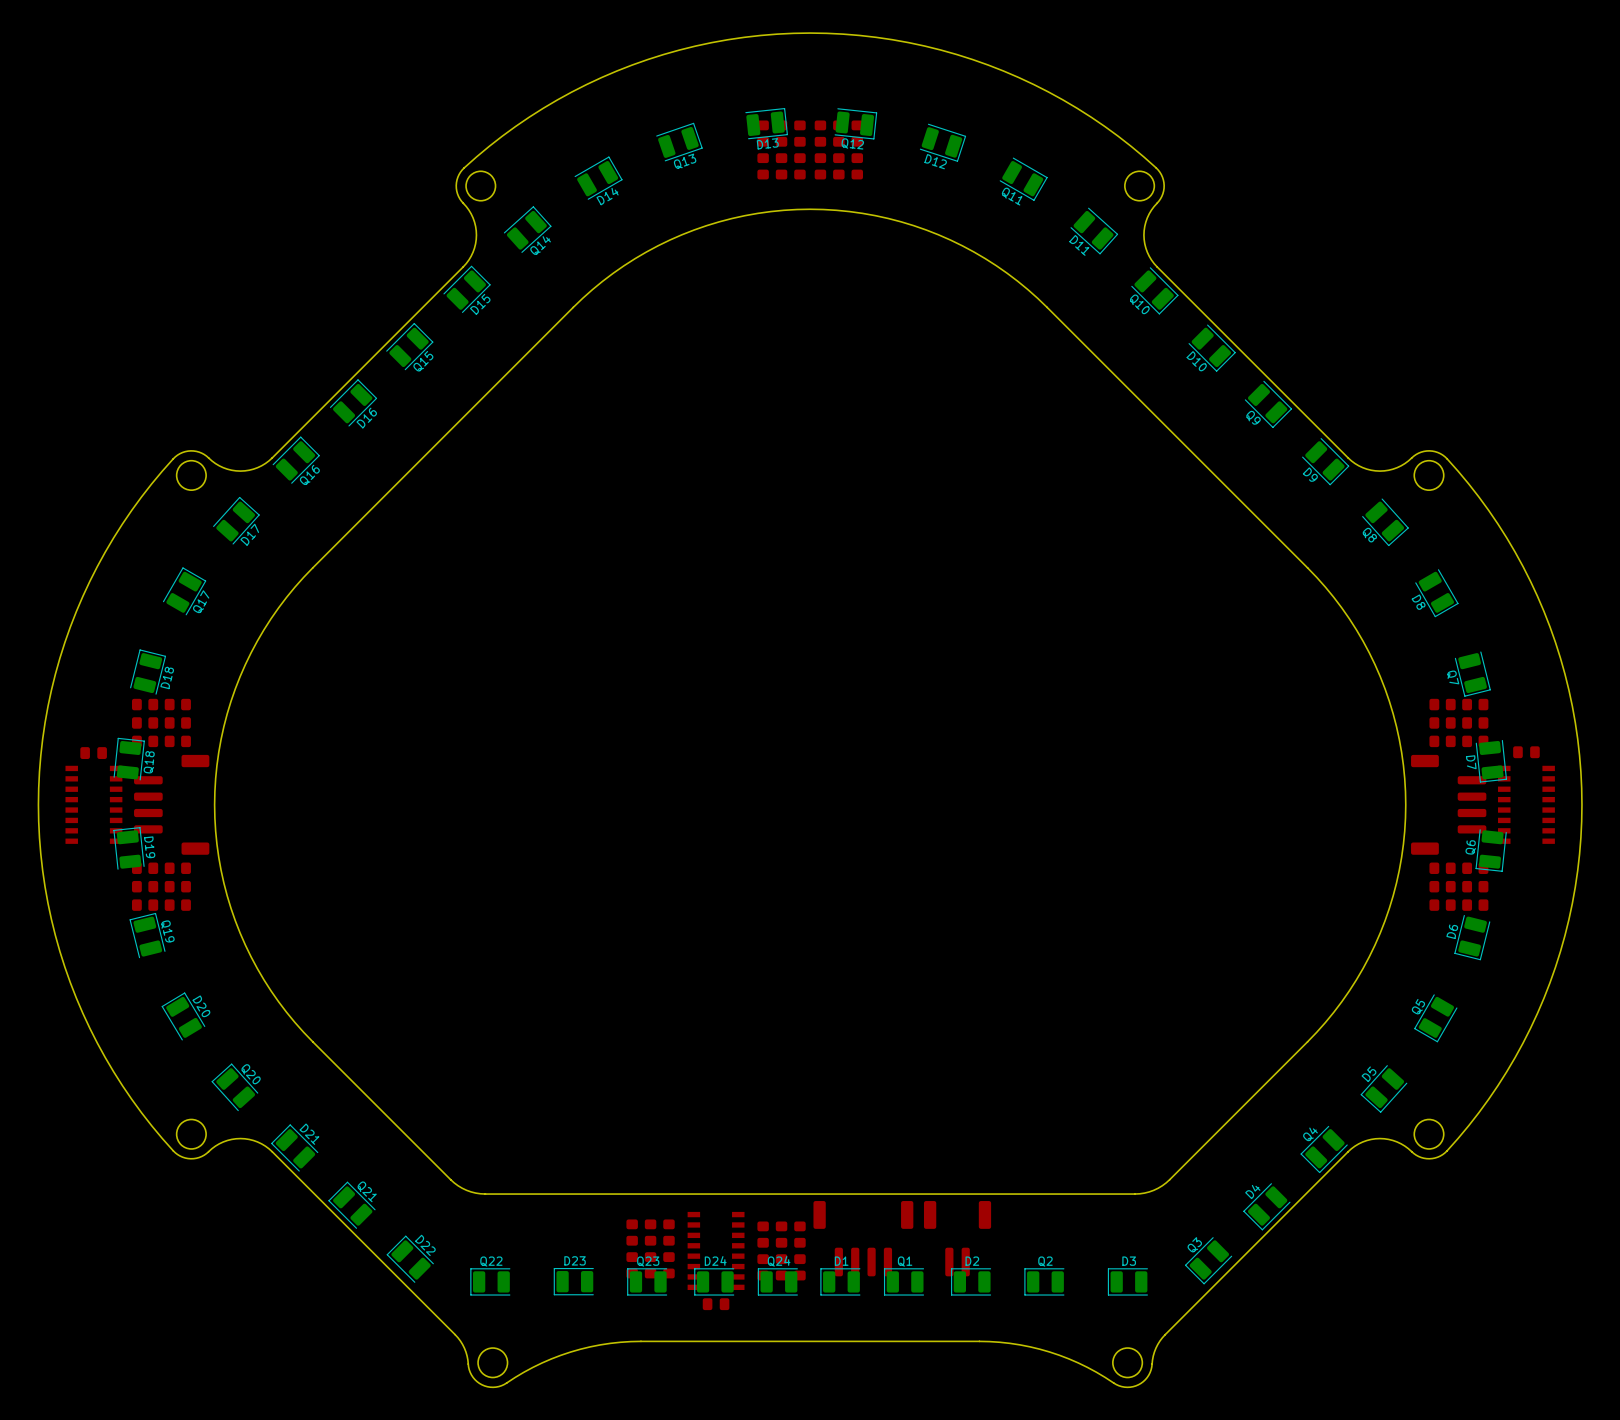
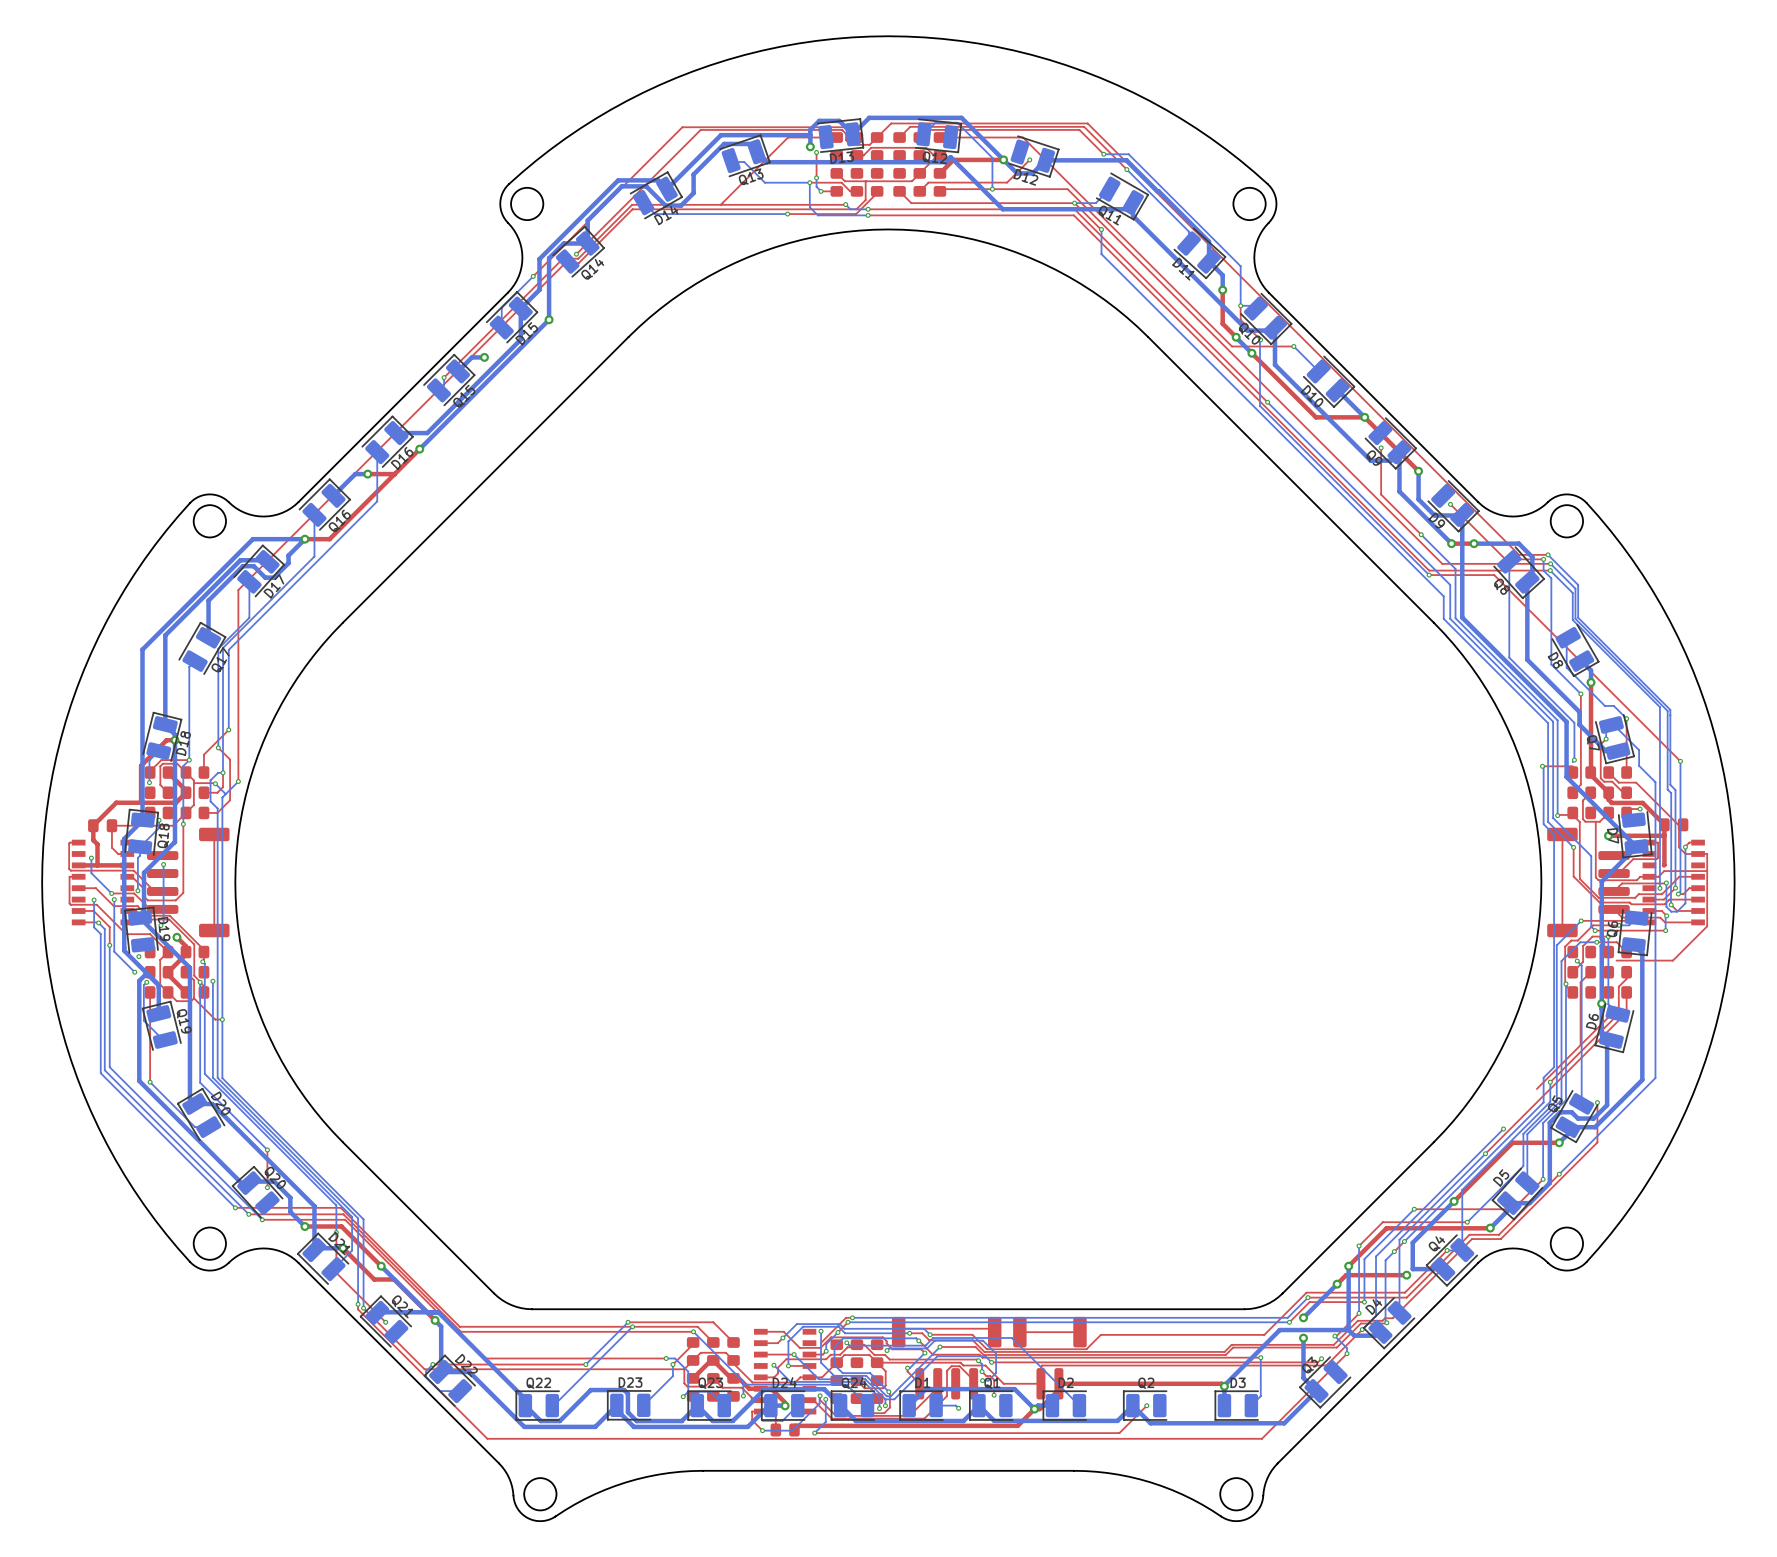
bottom track: none -> (923, 134) (935, 122) (957, 122) (992, 157) (992, 189)
bottom track: none -> (810, 135) (721, 135) (666, 189) (658, 180) (618, 180) (539, 259) (539, 289) (520, 308) (520, 339) (427, 433) (396, 433)
top track: none -> (836, 137) (788, 137) (720, 204)
top track: none -> (856, 137) (846, 127) (682, 127) (533, 276)
top track: none -> (877, 137) (891, 123) (1087, 123) (1519, 554) (1548, 554)
top track: none -> (877, 137) (869, 144) (850, 144) (846, 140) (846, 133) (842, 129) (700, 129) (576, 254)
top track: none -> (899, 137) (910, 126) (1084, 126) (1126, 169)
top track: none -> (919, 137) (927, 129) (1079, 129) (1103, 154)
top track: none -> (939, 137) (1023, 137) (1231, 346) (1293, 346)
bottom track: none -> (810, 146) (810, 129) (819, 120) (839, 120) (852, 134) (869, 117) (961, 117) (1017, 173) (1032, 173) (1045, 160) (1126, 160) (1209, 241) (1209, 261) (1222, 275) (1222, 290)
via: none -> (810, 146)
top track: none -> (816, 152) (816, 177)
via: none -> (816, 152)
bottom track: none -> (1103, 154) (1128, 154) (1240, 266) (1240, 305) (1253, 305) (1255, 308)
via: none -> (1103, 154)
top track: none -> (856, 155) (863, 155) (871, 147) (926, 147) (935, 157)
top track: none -> (935, 157) (911, 181) (844, 181) (836, 173)
top track: none -> (1003, 159) (953, 159) (939, 173)
via: none -> (1003, 159)
top track: none -> (1029, 159) (1007, 182) (928, 182) (919, 191)
via: none -> (1029, 159)
bottom track: none -> (731, 160) (744, 162) (764, 182) (809, 182) (809, 207) (817, 215) (868, 215)
bottom track: none -> (1126, 169) (1189, 231) (1189, 243)
via: none -> (1126, 169)
bottom track: none -> (816, 177) (816, 186) (821, 191)
via: none -> (816, 177)
top track: none -> (865, 181) (865, 200) (856, 209) (632, 209) (578, 263) (565, 263) (238, 590) (238, 781)
top track: none -> (809, 182) (841, 182) (850, 191) (856, 191)
via: none -> (809, 182)
via: none -> (992, 189)
bottom track: none -> (1109, 189) (1095, 203) (1074, 203)
via: none -> (821, 191)
top track: none -> (836, 191) (821, 191)
top track: none -> (877, 191) (856, 214) (787, 214)
top track: none -> (899, 191) (911, 203) (1074, 203) (1101, 229)
top track: none -> (939, 191) (942, 189) (1067, 189) (1442, 563) (1550, 563)
bottom track: none -> (643, 202) (655, 214) (787, 214)
bottom track: none -> (1133, 202) (1133, 216) (1247, 330) (1272, 330) (1274, 327) (1274, 364) (1370, 460) (1390, 460) (1399, 452) (1399, 491) (1451, 543)
via: none -> (1074, 203)
top track: none -> (845, 204) (632, 204) (578, 258) (562, 258) (444, 377)
bottom track: none -> (845, 204) (850, 209) (868, 209)
via: none -> (845, 204)
top track: none -> (868, 209) (1074, 209) (1267, 402)
via: none -> (868, 209)
bottom track: none -> (1133, 209) (1002, 209) (950, 157) (945, 162) (767, 162) (748, 143) (724, 143) (693, 174) (693, 193) (681, 205) (665, 205) (646, 186) (621, 186) (587, 220) (587, 243) (563, 243) (549, 258) (549, 319) (419, 449)
via: none -> (787, 214)
top track: none -> (868, 215) (1073, 215) (1429, 570) (1550, 570)
via: none -> (868, 215)
bottom track: none -> (1101, 229) (1101, 254) (1443, 596) (1443, 618) (1548, 723) (1548, 821) (1573, 847)
via: none -> (1101, 229)
via: none -> (576, 254)
bottom track: none -> (533, 276) (501, 307) (501, 327)
via: none -> (533, 276)
top track: none -> (1222, 290) (1222, 323) (1236, 337)
via: none -> (1222, 290)
top track: none -> (1240, 305) (1240, 319) (1260, 339)
via: none -> (1240, 305)
via: none -> (549, 319)
bottom track: none -> (1236, 337) (1251, 353)
via: none -> (1236, 337)
bottom track: none -> (1260, 339) (1260, 405) (1429, 575)
via: none -> (1260, 339)
bottom track: none -> (1293, 346) (1318, 371)
via: none -> (1293, 346)
top track: none -> (1251, 353) (1316, 417) (1364, 417) (1418, 471)
via: none -> (1251, 353)
bottom track: none -> (484, 357) (471, 357) (458, 371)
via: none -> (484, 357)
bottom track: none -> (444, 377) (444, 385) (438, 390)
via: none -> (444, 377)
bottom track: none -> (1337, 390) (1364, 417)
bottom track: none -> (1267, 402) (1450, 584) (1450, 618) (1553, 721) (1553, 817) (1591, 856) (1591, 926) (1595, 930)
via: none -> (1267, 402)
via: none -> (1364, 417)
top track: none -> (1381, 447) (1381, 494) (1421, 534)
via: none -> (1381, 447)
top track: none -> (419, 449) (329, 539) (304, 539)
via: none -> (419, 449)
bottom track: none -> (377, 452) (377, 501) (228, 649) (228, 729)
bottom track: none -> (1418, 471) (1418, 499) (1434, 515) (1462, 514) (1462, 617) (1566, 721) (1566, 776) (1636, 846) (1601, 881) (1601, 1034) (1607, 1040)
via: none -> (1418, 471)
bottom track: none -> (367, 474) (355, 474) (333, 495)
via: none -> (367, 474)
top track: none -> (394, 474) (367, 474)
top track: none -> (1450, 504) (1505, 559) (1543, 559)
via: none -> (1450, 504)
bottom track: none -> (314, 514) (314, 556) (223, 647) (223, 772) (218, 772) (210, 780) (210, 801) (217, 808) (217, 1077) (358, 1218) (358, 1304)
bottom track: none -> (1421, 534) (1455, 568) (1455, 618) (1557, 720) (1557, 815)
via: none -> (1421, 534)
via: none -> (304, 539)
via: none -> (1451, 543)
top track: none -> (1474, 543) (1451, 543)
bottom track: none -> (1474, 543) (1518, 543) (1532, 557) (1532, 576) (1527, 581) (1527, 659) (1579, 711) (1579, 724) (1605, 751) (1617, 751)
via: none -> (1474, 543)
bottom track: none -> (1548, 554) (1578, 584) (1578, 617) (1670, 709) (1670, 784) (1675, 789) (1675, 888)
via: none -> (1548, 554)
bottom track: none -> (1543, 559) (1543, 570) (1551, 578) (1551, 664) (1580, 694)
via: none -> (1543, 559)
bottom track: none -> (267, 561) (240, 560) (165, 635) (165, 724) (174, 734) (174, 842) (144, 872) (144, 914) (140, 918) (189, 967) (189, 1099) (194, 1104) (212, 1104) (314, 1206) (314, 1250) (316, 1248) (343, 1248)
bottom track: none -> (1509, 561) (1509, 657) (1574, 722) (1574, 760) (1572, 761)
bottom track: none -> (1550, 563) (1575, 588) (1575, 618) (1667, 711) (1667, 789) (1671, 793) (1671, 904)
via: none -> (1550, 563)
bottom track: none -> (1550, 570) (1572, 593) (1572, 619) (1659, 707) (1659, 888)
via: none -> (1550, 570)
top track: none -> (1429, 575) (1494, 575) (1680, 761)
via: none -> (1429, 575)
bottom track: none -> (249, 581) (249, 617) (218, 648) (218, 747)
bottom track: none -> (208, 637) (208, 600) (242, 566) (253, 566) (265, 577) (274, 577) (288, 563) (288, 555) (304, 539) (252, 539) (142, 649) (142, 820) (124, 838) (124, 950) (158, 985) (158, 1013)
bottom track: none -> (1568, 637) (1566, 667) (1604, 705) (1613, 705) (1626, 718)
bottom track: none -> (195, 661) (189, 666) (189, 760) (183, 766) (183, 824)
bottom track: none -> (1581, 661) (1591, 670) (1591, 682)
top track: none -> (1591, 682) (1590, 774) (1608, 792) (1608, 799) (1611, 802) (1642, 802) (1664, 824) (1664, 865)
via: none -> (1591, 682)
top track: none -> (1580, 694) (1580, 784) (1572, 792)
via: none -> (1580, 694)
top track: none -> (1626, 718) (1626, 772)
via: none -> (1626, 718)
top track: none -> (228, 729) (203, 754) (203, 772)
via: none -> (228, 729)
top track: none -> (1606, 739) (1600, 744) (1600, 778) (1604, 781) (1612, 781) (1623, 792) (1626, 792)
bottom track: none -> (1606, 739) (1606, 730) (1613, 724) (1639, 750) (1639, 765) (1655, 782) (1655, 1078) (1559, 1174)
via: none -> (1606, 739)
top track: none -> (174, 740) (166, 740) (141, 765) (141, 802)
via: none -> (174, 740)
top track: none -> (218, 747) (230, 759) (230, 800) (217, 812) (203, 812)
via: none -> (218, 747)
bottom track: none -> (158, 751) (149, 760) (149, 782)
top track: none -> (189, 760) (161, 760) (150, 772)
via: none -> (189, 760)
via: none -> (1574, 760)
bottom track: none -> (1680, 761) (1680, 891) (1678, 894)
via: none -> (1680, 761)
bottom track: none -> (1542, 766) (1543, 824) (1554, 834) (1554, 1067) (1543, 1077) (1543, 1102) (1404, 1241)
via: none -> (1542, 766)
top track: none -> (1572, 766) (1542, 766)
top track: none -> (168, 772) (186, 790) (176, 802) (116, 802) (93, 825) (93, 840) (97, 844) (97, 865)
top track: none -> (223, 772) (223, 787) (217, 792) (203, 792)
via: none -> (223, 772)
top track: none -> (1608, 772) (1618, 782) (1636, 782) (1680, 826)
bottom track: none -> (238, 781) (222, 797) (222, 1078) (363, 1219) (363, 1308)
via: none -> (238, 781)
via: none -> (149, 782)
top track: none -> (193, 783) (215, 783)
bottom track: none -> (215, 783) (225, 794)
via: none -> (215, 783)
top track: none -> (168, 792) (160, 785) (160, 766) (162, 763) (177, 763) (193, 780) (193, 805) (173, 825) (111, 825) (111, 847) (118, 853) (127, 853)
top track: none -> (1590, 792) (1582, 800) (1582, 819) (1585, 821) (1599, 821) (1608, 812)
top track: none -> (1640, 809) (1630, 809) (1626, 812)
via: none -> (1640, 809)
via: none -> (1557, 815)
top track: none -> (1572, 814) (1579, 822) (1579, 878) (1598, 897) (1635, 897) (1638, 894) (1661, 894) (1679, 876) (1698, 876)
top track: none -> (1572, 814) (1557, 815)
bottom track: none -> (159, 820) (159, 828) (140, 846) (140, 855) (137, 857) (137, 890)
via: none -> (159, 820)
top track: none -> (1595, 821) (1595, 877) (1598, 880) (1636, 880) (1640, 876) (1658, 876) (1664, 871) (1707, 871)
top track: none -> (183, 824) (183, 892) (175, 900) (147, 900) (143, 895) (143, 888) (132, 876) (127, 876)
via: none -> (183, 824)
top track: none -> (1683, 824) (1679, 827) (1679, 847) (1685, 853) (1707, 853) (1707, 926) (1672, 960) (1616, 960)
top track: none -> (214, 834) (214, 930)
top track: none -> (1562, 834) (1562, 930)
via: none -> (1608, 835)
top track: none -> (1664, 835) (1608, 835)
top track: none -> (78, 842) (69, 843) (69, 868) (70, 870) (133, 870) (154, 891) (162, 891)
top track: none -> (1649, 842) (1658, 842) (1656, 859) (1633, 859) (1618, 873) (1614, 873)
top track: none -> (1698, 842) (1689, 842) (1685, 847)
top track: none -> (1573, 847) (1573, 876) (1599, 902) (1664, 904) (1669, 899) (1698, 899)
via: none -> (1573, 847)
bottom track: none -> (1685, 847) (1685, 903) (1677, 911) (1671, 911) (1666, 906) (1666, 883)
via: none -> (1685, 847)
bottom track: none -> (91, 858) (91, 873) (111, 893)
via: none -> (91, 858)
bottom track: none -> (163, 864) (163, 922) (160, 925)
via: none -> (163, 864)
top track: none -> (127, 865) (78, 865)
top track: none -> (78, 876) (69, 876) (69, 903) (96, 904) (126, 934) (150, 934) (168, 952) (160, 959) (160, 984) (176, 1001) (191, 1001) (194, 998)
top track: none -> (1666, 883) (1622, 883) (1614, 891)
via: none -> (1666, 883)
top track: none -> (1675, 888) (1663, 899) (1649, 899)
via: none -> (1675, 888)
top track: none -> (78, 888) (95, 888) (113, 906) (137, 906) (147, 915) (169, 915) (203, 949) (202, 961)
via: none -> (1659, 888)
top track: none -> (1698, 888) (1689, 888) (1683, 894) (1678, 894)
via: none -> (137, 890)
top track: none -> (111, 893) (134, 893) (150, 909) (162, 909)
via: none -> (111, 893)
via: none -> (1678, 894)
bottom track: none -> (94, 900) (94, 927) (100, 934) (100, 1073) (235, 1207)
via: none -> (94, 900)
bottom track: none -> (114, 899) (114, 951) (134, 972)
via: none -> (114, 899)
top track: none -> (1671, 904) (1677, 910) (1698, 910)
via: none -> (1671, 904)
top track: none -> (1614, 909) (1622, 917) (1660, 917) (1665, 922) (1698, 922)
top track: none -> (78, 910) (93, 910) (109, 927) (109, 945)
top track: none -> (127, 910) (135, 910) (144, 919) (169, 919) (194, 944) (194, 975) (203, 986) (203, 992)
top track: none -> (1649, 910) (1661, 910) (1666, 915)
bottom track: none -> (1666, 915) (1665, 930)
via: none -> (1666, 915)
bottom track: none -> (1636, 918) (1629, 925) (1619, 925)
top track: none -> (1581, 920) (1649, 922)
bottom track: none -> (1581, 920) (1556, 945) (1556, 1100) (1523, 1133) (1523, 1166) (1467, 1222)
via: none -> (1581, 920)
top track: none -> (78, 922) (98, 922)
bottom track: none -> (98, 922) (104, 929) (104, 1070) (248, 1214)
via: none -> (98, 922)
top track: none -> (1619, 925) (1593, 925) (1577, 940) (1571, 940) (1565, 946) (1565, 983) (1572, 992)
via: none -> (1619, 925)
via: none -> (160, 925)
via: none -> (1595, 930)
top track: none -> (1665, 930) (1595, 930)
via: none -> (1665, 930)
top track: none -> (176, 937) (186, 946) (186, 954) (168, 974) (186, 992)
via: none -> (176, 937)
top track: none -> (1608, 936) (1592, 936) (1583, 946) (1583, 961) (1572, 972)
bottom track: none -> (1608, 936) (1608, 1004) (1617, 1013)
via: none -> (1608, 936)
top track: none -> (1596, 942) (1616, 942) (1626, 952)
bottom track: none -> (1596, 942) (1580, 942) (1561, 961) (1561, 1100) (1527, 1134) (1527, 1183)
via: none -> (1596, 942)
bottom track: none -> (1633, 944) (1642, 953) (1642, 1079) (1595, 1127) (1568, 1127) (1568, 1133) (1559, 1142)
bottom track: none -> (109, 945) (109, 1067) (262, 1219)
via: none -> (109, 945)
via: none -> (138, 956)
bottom track: none -> (1577, 961) (1581, 965) (1581, 1103)
via: none -> (1577, 961)
bottom track: none -> (202, 961) (204, 963) (204, 1073) (336, 1205) (336, 1232)
via: none -> (202, 961)
via: none -> (134, 972)
top track: none -> (186, 972) (194, 980) (194, 998)
top track: none -> (1590, 972) (1580, 982) (1580, 1045)
top track: none -> (1626, 972) (1626, 978) (1618, 986) (1618, 1013) (1550, 1082)
bottom track: none -> (148, 974) (139, 980) (139, 1080) (241, 1183) (274, 1181) (290, 1197) (290, 1211) (304, 1226)
bottom track: none -> (212, 981) (212, 1077) (352, 1216) (352, 1250) (333, 1269)
via: none -> (212, 981)
bottom track: none -> (146, 982) (143, 985) (143, 1020) (165, 1040)
via: none -> (146, 982)
bottom track: none -> (200, 982) (200, 1082) (267, 1149)
via: none -> (200, 982)
bottom track: none -> (1565, 983) (1565, 1100) (1543, 1123) (1543, 1179)
via: none -> (1565, 983)
top track: none -> (150, 992) (150, 1082)
top track: none -> (1626, 992) (1626, 1012) (1485, 1153)
top track: none -> (194, 998) (215, 1019) (222, 1019)
via: none -> (1601, 1003)
top track: none -> (1608, 1017) (1536, 1088)
via: none -> (222, 1019)
bottom track: none -> (1607, 1040) (1607, 1105) (1593, 1118) (1578, 1118) (1571, 1112) (1560, 1112) (1549, 1122) (1549, 1183) (1529, 1203) (1509, 1203) (1509, 1209) (1490, 1228)
bottom track: none -> (150, 1082) (195, 1127) (208, 1127)
via: none -> (150, 1082)
bottom track: none -> (1550, 1082) (1550, 1101) (1462, 1189) (1462, 1250) (1447, 1250)
via: none -> (1550, 1082)
top track: none -> (1597, 1102) (1597, 1142) (1500, 1239) (1472, 1239) (1392, 1318) (1384, 1318) (1382, 1320) (1357, 1320) (1333, 1344) (1231, 1344) (1224, 1351) (984, 1351) (972, 1340) (929, 1340) (922, 1333) (909, 1333)
via: none -> (1597, 1102)
bottom track: none -> (1503, 1128) (1376, 1256) (1376, 1315) (1362, 1329)
via: none -> (1503, 1128)
top track: none -> (1559, 1142) (1512, 1142) (1454, 1201)
via: none -> (1559, 1142)
top track: none -> (267, 1149) (267, 1187)
via: none -> (267, 1149)
bottom track: none -> (1485, 1153) (1399, 1239) (1399, 1312)
via: none -> (1485, 1153)
top track: none -> (1559, 1174) (1498, 1234) (1469, 1234) (1406, 1297) (1307, 1297)
via: none -> (1559, 1174)
top track: none -> (1543, 1179) (1513, 1209) (1414, 1209)
via: none -> (1543, 1179)
via: none -> (267, 1187)
bottom track: none -> (1454, 1201) (1412, 1242) (1412, 1269) (1443, 1269)
via: none -> (1454, 1201)
top track: none -> (235, 1207) (340, 1207) (459, 1326) (697, 1326) (713, 1342)
via: none -> (235, 1207)
bottom track: none -> (1414, 1209) (1364, 1259) (1364, 1302)
via: none -> (1414, 1209)
top track: none -> (248, 1214) (343, 1214) (460, 1331) (693, 1331)
via: none -> (248, 1214)
top track: none -> (262, 1219) (345, 1219) (483, 1358) (666, 1358)
via: none -> (262, 1219)
top track: none -> (1467, 1222) (1382, 1222) (1359, 1246)
via: none -> (1467, 1222)
top track: none -> (304, 1226) (341, 1226) (381, 1266)
via: none -> (304, 1226)
top track: none -> (1490, 1228) (1386, 1228) (1348, 1266)
via: none -> (1490, 1228)
top track: none -> (336, 1232) (336, 1272) (384, 1322)
via: none -> (336, 1232)
top track: none -> (1404, 1241) (1394, 1251)
via: none -> (1404, 1241)
bottom track: none -> (1359, 1246) (1359, 1313)
via: none -> (1359, 1246)
top track: none -> (343, 1248) (374, 1279) (394, 1279) (435, 1320)
via: none -> (343, 1248)
top track: none -> (1447, 1250) (1404, 1292) (1306, 1292) (1264, 1334) (1100, 1334) (1086, 1349) (986, 1349) (972, 1334) (930, 1334)
via: none -> (1447, 1250)
bottom track: none -> (1394, 1251) (1385, 1260) (1386, 1322)
via: none -> (1394, 1251)
bottom track: none -> (381, 1266) (427, 1312)
via: none -> (381, 1266)
bottom track: none -> (1348, 1266) (1348, 1330)
via: none -> (1348, 1266)
top track: none -> (1406, 1275) (1346, 1275) (1337, 1284)
via: none -> (1406, 1275)
bottom track: none -> (1337, 1284) (1303, 1317)
via: none -> (1337, 1284)
bottom track: none -> (1307, 1297) (1287, 1317) (852, 1317)
via: none -> (1307, 1297)
top track: none -> (1364, 1302) (1309, 1302) (1289, 1322)
via: none -> (1364, 1302)
top track: none -> (358, 1304) (358, 1309) (487, 1438) (1261, 1438) (1347, 1353)
via: none -> (358, 1304)
top track: none -> (363, 1308) (424, 1369) (684, 1369)
via: none -> (363, 1308)
bottom track: none -> (377, 1312) (438, 1312) (525, 1399) (525, 1405) (540, 1421) (559, 1421) (590, 1390) (624, 1390) (627, 1393) (627, 1412) (636, 1421) (681, 1421) (697, 1405) (712, 1420) (732, 1420) (764, 1389) (824, 1389) (856, 1421) (963, 1421) (978, 1405) (994, 1420) (1117, 1420) (1132, 1405) (1150, 1423) (1284, 1423) (1316, 1391) (1303, 1378) (1303, 1338)
top track: none -> (1359, 1313) (1334, 1336)
via: none -> (1359, 1313)
top track: none -> (852, 1317) (846, 1317) (820, 1343)
via: none -> (852, 1317)
via: none -> (1303, 1317)
bottom track: none -> (435, 1320) (441, 1326) (441, 1372) (469, 1372) (524, 1426) (595, 1426) (616, 1405) (616, 1409) (633, 1426) (747, 1426) (769, 1405) (785, 1405)
via: none -> (435, 1320)
via: none -> (385, 1322)
top track: none -> (628, 1322) (713, 1322) (733, 1342)
bottom track: none -> (628, 1322) (585, 1364)
via: none -> (628, 1322)
top track: none -> (847, 1322) (837, 1332)
via: none -> (847, 1322)
bottom track: none -> (1289, 1322) (847, 1322)
via: none -> (1289, 1322)
top track: none -> (1386, 1322) (1360, 1323) (1336, 1347) (1233, 1347) (1225, 1354) (983, 1354) (975, 1346) (939, 1346)
via: none -> (1386, 1322)
bottom track: none -> (632, 1326) (552, 1405)
via: none -> (632, 1326)
bottom track: none -> (1348, 1330) (1354, 1335) (1376, 1335) (1380, 1331)
bottom track: none -> (1348, 1330) (1279, 1330) (1224, 1385) (1224, 1405)
top track: none -> (1362, 1329) (1326, 1365) (1042, 1365) (1040, 1383) (1003, 1383) (985, 1365) (963, 1365) (960, 1362) (877, 1362)
via: none -> (1362, 1329)
bottom track: none -> (693, 1331) (743, 1381) (743, 1395)
via: none -> (693, 1331)
top track: none -> (760, 1331) (783, 1331) (799, 1347) (820, 1347) (831, 1337) (882, 1337) (892, 1349) (921, 1349) (924, 1353)
bottom track: none -> (821, 1331) (821, 1362) (834, 1375) (866, 1375) (886, 1396) (890, 1396) (933, 1353)
via: none -> (821, 1331)
top track: none -> (994, 1332) (991, 1328) (902, 1328) (898, 1332)
top track: none -> (1080, 1332) (1019, 1332)
bottom track: none -> (837, 1332) (826, 1344) (826, 1351)
via: none -> (837, 1332)
bottom track: none -> (909, 1333) (845, 1333) (838, 1326) (803, 1326) (788, 1341) (788, 1365)
via: none -> (909, 1333)
bottom track: none -> (930, 1334) (924, 1328) (844, 1328) (839, 1324) (796, 1324) (782, 1338)
via: none -> (930, 1334)
bottom track: none -> (1334, 1336) (1347, 1348) (1347, 1353)
via: none -> (1334, 1336)
top track: none -> (782, 1338) (777, 1343) (760, 1343)
via: none -> (782, 1338)
via: none -> (1303, 1338)
top track: none -> (918, 1340) (932, 1354) (979, 1354) (982, 1357) (1260, 1357)
bottom track: none -> (918, 1340) (916, 1338) (843, 1338) (834, 1346) (834, 1364) (842, 1373) (870, 1373) (888, 1391)
via: none -> (918, 1340)
top track: none -> (693, 1342) (672, 1364)
bottom track: none -> (846, 1342) (849, 1345) (925, 1345) (933, 1338) (1011, 1338) (1079, 1405)
via: none -> (846, 1342)
bottom track: none -> (939, 1346) (933, 1353)
via: none -> (939, 1346)
bottom track: none -> (887, 1350) (889, 1348) (926, 1348) (934, 1340) (983, 1340) (996, 1353) (996, 1373) (988, 1380) (982, 1380)
via: none -> (887, 1350)
top track: none -> (826, 1351) (822, 1354) (809, 1354)
via: none -> (826, 1351)
bottom track: none -> (924, 1353) (907, 1368)
via: none -> (924, 1353)
via: none -> (1347, 1353)
top track: none -> (794, 1354) (760, 1354)
bottom track: none -> (794, 1354) (818, 1379) (865, 1379) (885, 1399)
via: none -> (794, 1354)
bottom track: none -> (666, 1358) (675, 1358) (688, 1371) (688, 1391)
via: none -> (666, 1358)
bottom track: none -> (1260, 1357) (1260, 1396) (1251, 1405)
via: none -> (1260, 1357)
top track: none -> (1321, 1358) (1317, 1362) (991, 1362)
via: none -> (1321, 1358)
top track: none -> (978, 1360) (889, 1359) (885, 1354) (874, 1354) (864, 1344) (856, 1344) (854, 1347) (847, 1347) (840, 1354) (830, 1354) (826, 1359) (786, 1359) (778, 1367) (778, 1373) (774, 1377) (760, 1377)
bottom track: none -> (978, 1360) (982, 1364) (982, 1371)
via: none -> (978, 1360)
bottom track: none -> (991, 1362) (985, 1356) (937, 1356) (894, 1399) (885, 1399)
via: none -> (991, 1362)
bottom track: none -> (432, 1364) (426, 1371) (426, 1377) (440, 1391) (460, 1391)
via: none -> (432, 1364)
top track: none -> (585, 1364) (432, 1364)
via: none -> (585, 1364)
bottom track: none -> (672, 1364) (672, 1376) (643, 1405)
via: none -> (672, 1364)
bottom track: none -> (773, 1365) (790, 1381) (863, 1381) (879, 1397) (879, 1408)
via: none -> (773, 1365)
via: none -> (788, 1365)
top track: none -> (809, 1365) (788, 1365)
top track: none -> (907, 1368) (907, 1371) (919, 1383)
via: none -> (907, 1368)
top track: none -> (684, 1369) (700, 1352) (725, 1352) (752, 1382) (795, 1382) (800, 1377) (822, 1377) (844, 1355) (869, 1355) (885, 1371) (885, 1385) (883, 1388) (864, 1388) (856, 1380)
top track: none -> (684, 1369) (684, 1383) (687, 1386) (705, 1386) (713, 1378) (722, 1387) (741, 1387) (751, 1397) (751, 1400) (769, 1400) (775, 1406) (775, 1430)
top track: none -> (982, 1371) (994, 1379) (994, 1395)
via: none -> (982, 1371)
top track: none -> (693, 1378) (713, 1360) (731, 1378) (738, 1378) (749, 1388) (771, 1388) (785, 1402)
via: none -> (982, 1380)
bottom track: none -> (743, 1384) (846, 1384) (867, 1405)
top track: none -> (937, 1383) (937, 1387) (909, 1415) (835, 1415) (820, 1400) (820, 1395)
top track: none -> (973, 1383) (973, 1380) (959, 1366) (951, 1366) (947, 1370) (947, 1396) (924, 1418) (831, 1418) (813, 1400) (809, 1400)
top track: none -> (1224, 1386) (1221, 1383) (1058, 1383) (1058, 1389) (1039, 1409) (1034, 1409) (1017, 1425) (794, 1425)
via: none -> (1224, 1386)
bottom track: none -> (688, 1391) (710, 1391) (724, 1405)
bottom track: none -> (688, 1391) (683, 1396)
top track: none -> (888, 1391) (889, 1407) (884, 1413) (871, 1413) (856, 1398)
via: none -> (888, 1391)
bottom track: none -> (820, 1395) (819, 1403) (792, 1430) (762, 1430)
via: none -> (820, 1395)
via: none -> (994, 1395)
via: none -> (683, 1396)
via: none -> (743, 1395)
bottom track: none -> (825, 1399) (825, 1422) (814, 1433)
via: none -> (825, 1399)
bottom track: none -> (885, 1399) (885, 1405)
bottom track: none -> (797, 1405) (782, 1420) (762, 1420)
bottom track: none -> (936, 1405) (955, 1405) (958, 1408)
bottom track: none -> (1052, 1405) (1038, 1405) (1034, 1409) (1014, 1389) (925, 1389) (909, 1405)
via: none -> (785, 1405)
via: none -> (885, 1405)
top track: none -> (1146, 1405) (1119, 1433) (814, 1433)
via: none -> (1146, 1405)
via: none -> (879, 1408)
via: none -> (958, 1408)
via: none -> (1034, 1409)
top track: none -> (760, 1411) (752, 1411) (752, 1420) (762, 1430)
via: none -> (762, 1430)
via: none -> (814, 1433)

